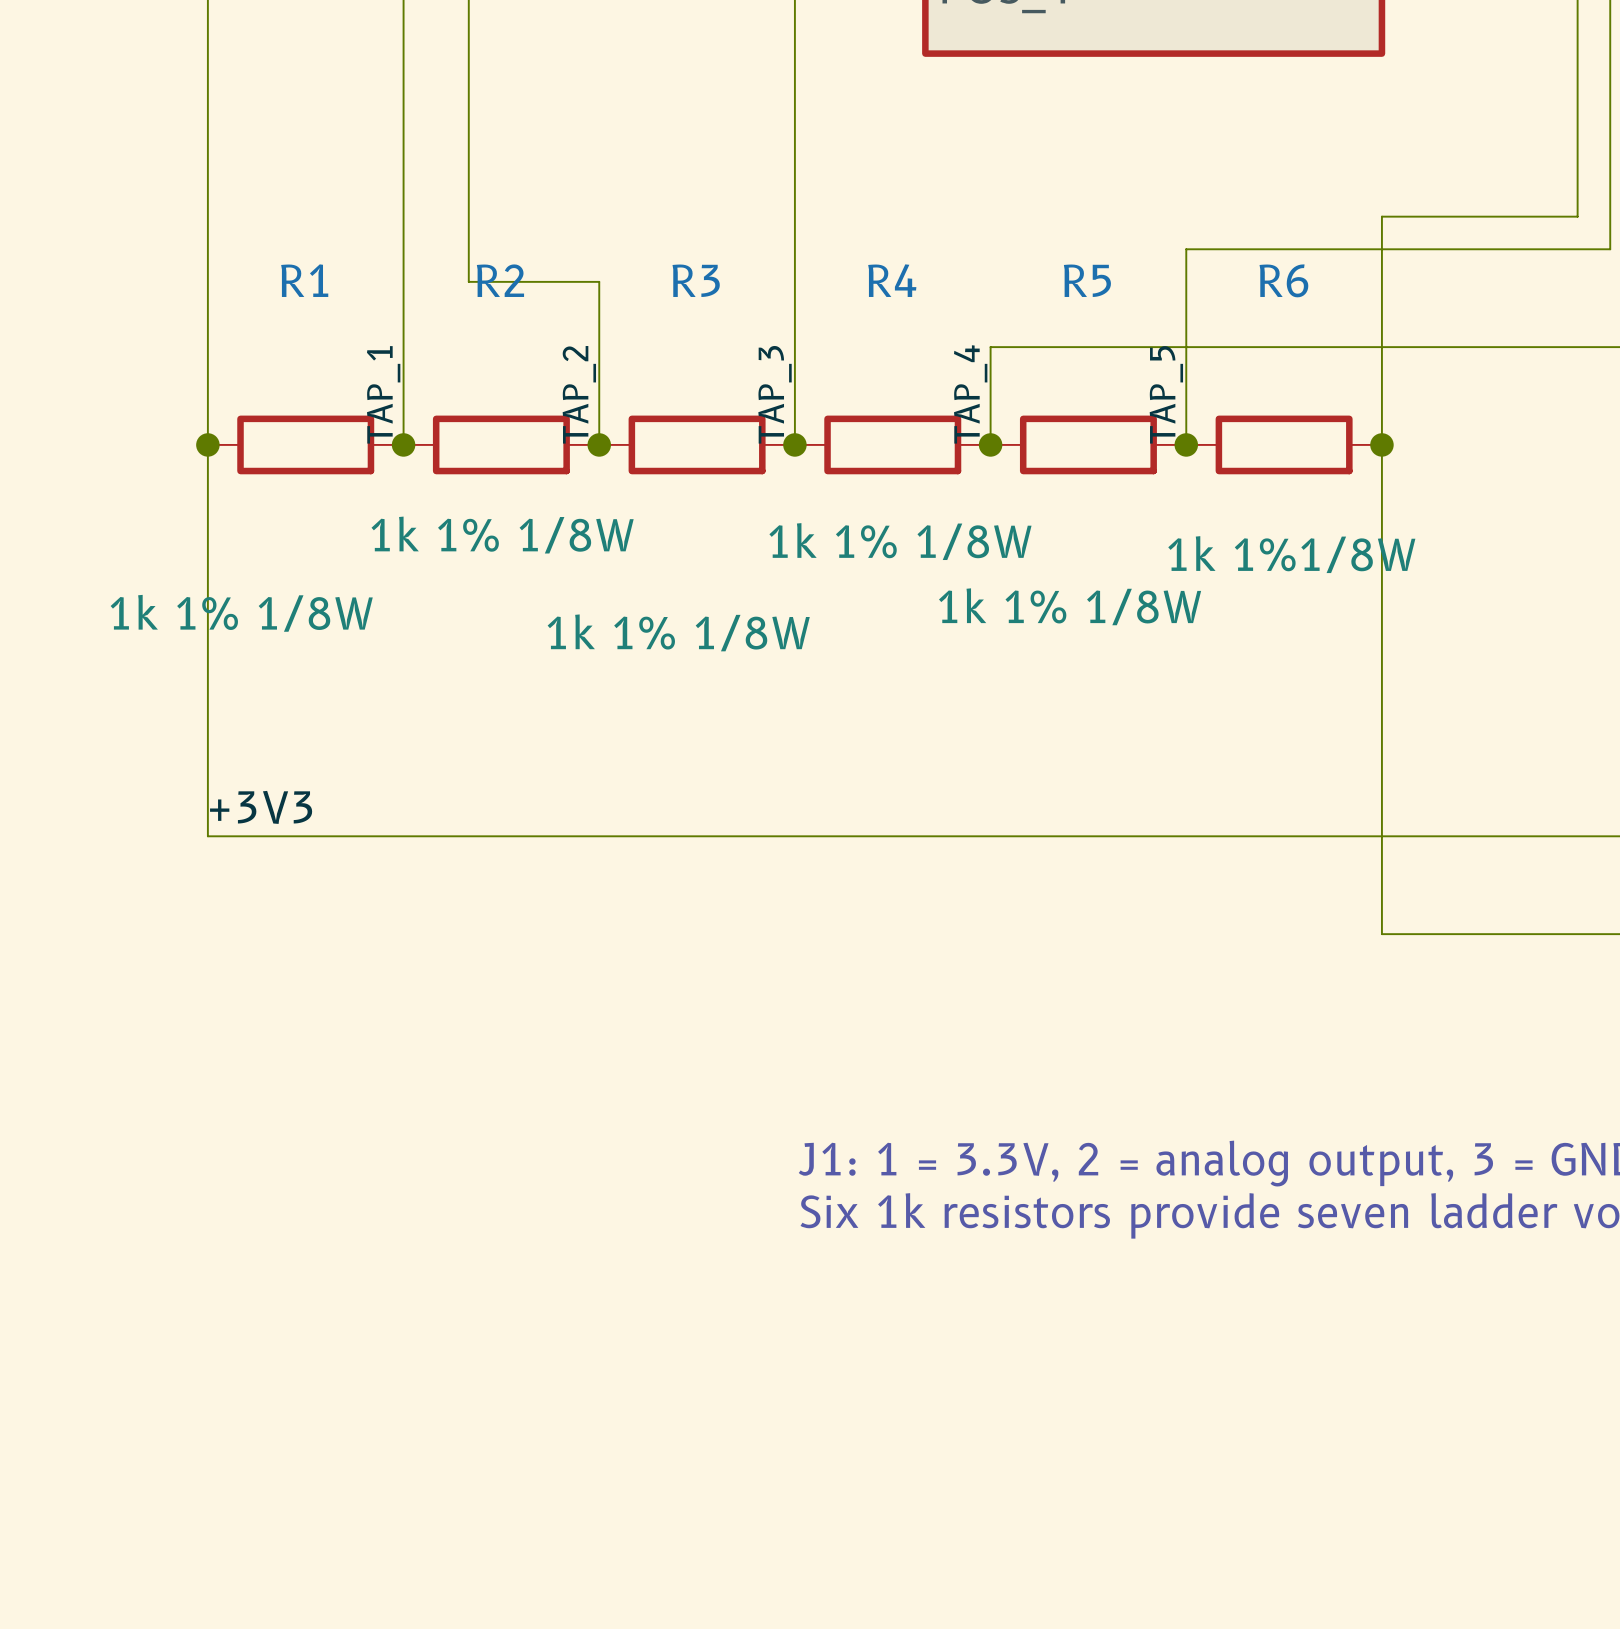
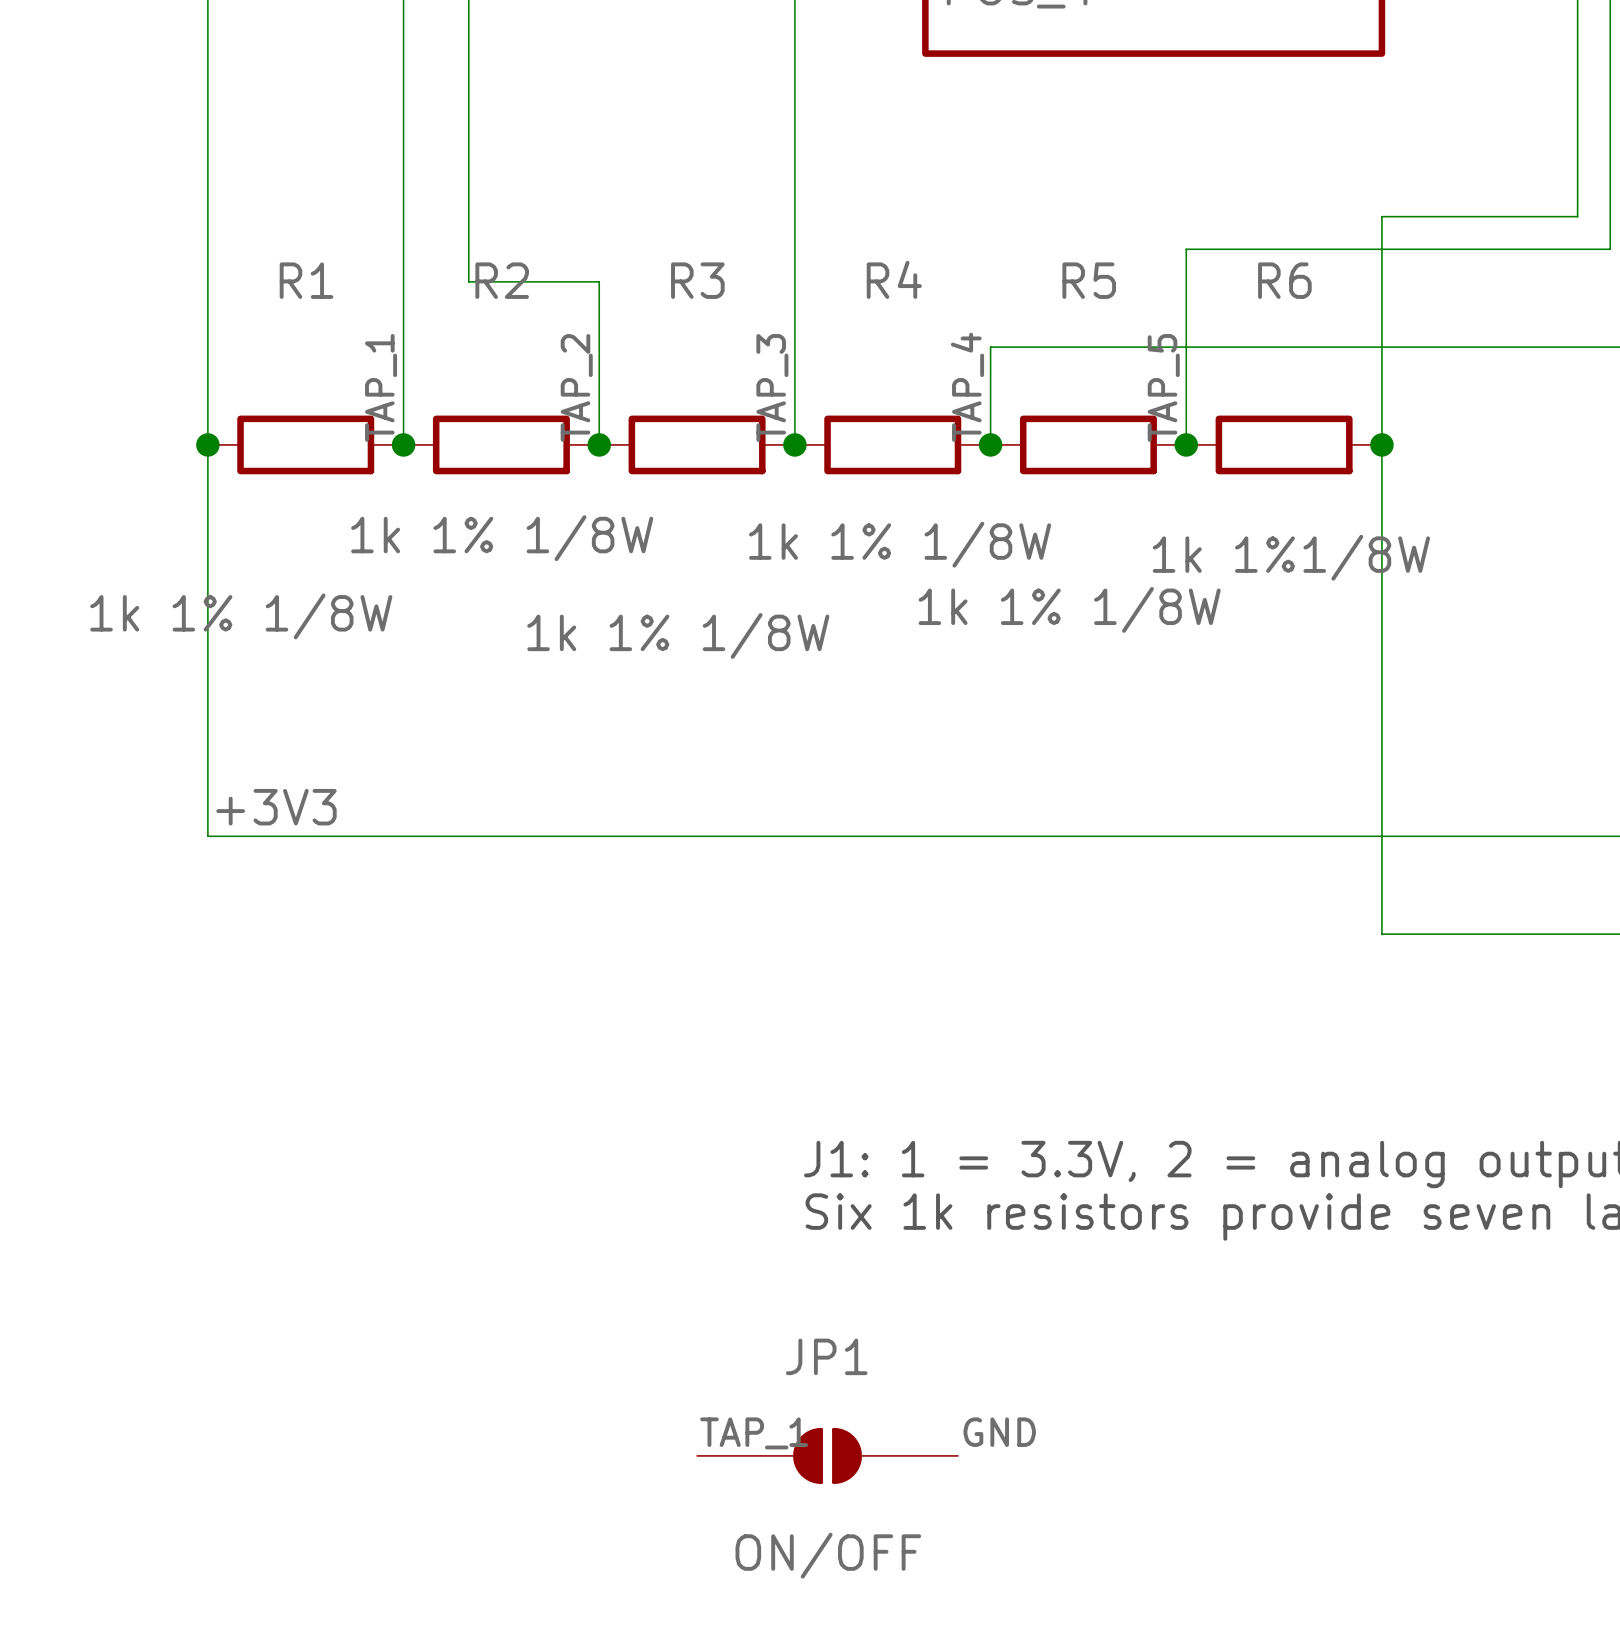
label: none -> GND (999, 1432)
label: none -> TAP_1 (754, 1433)
JP1: none -> ON/OFF (827, 1455)

